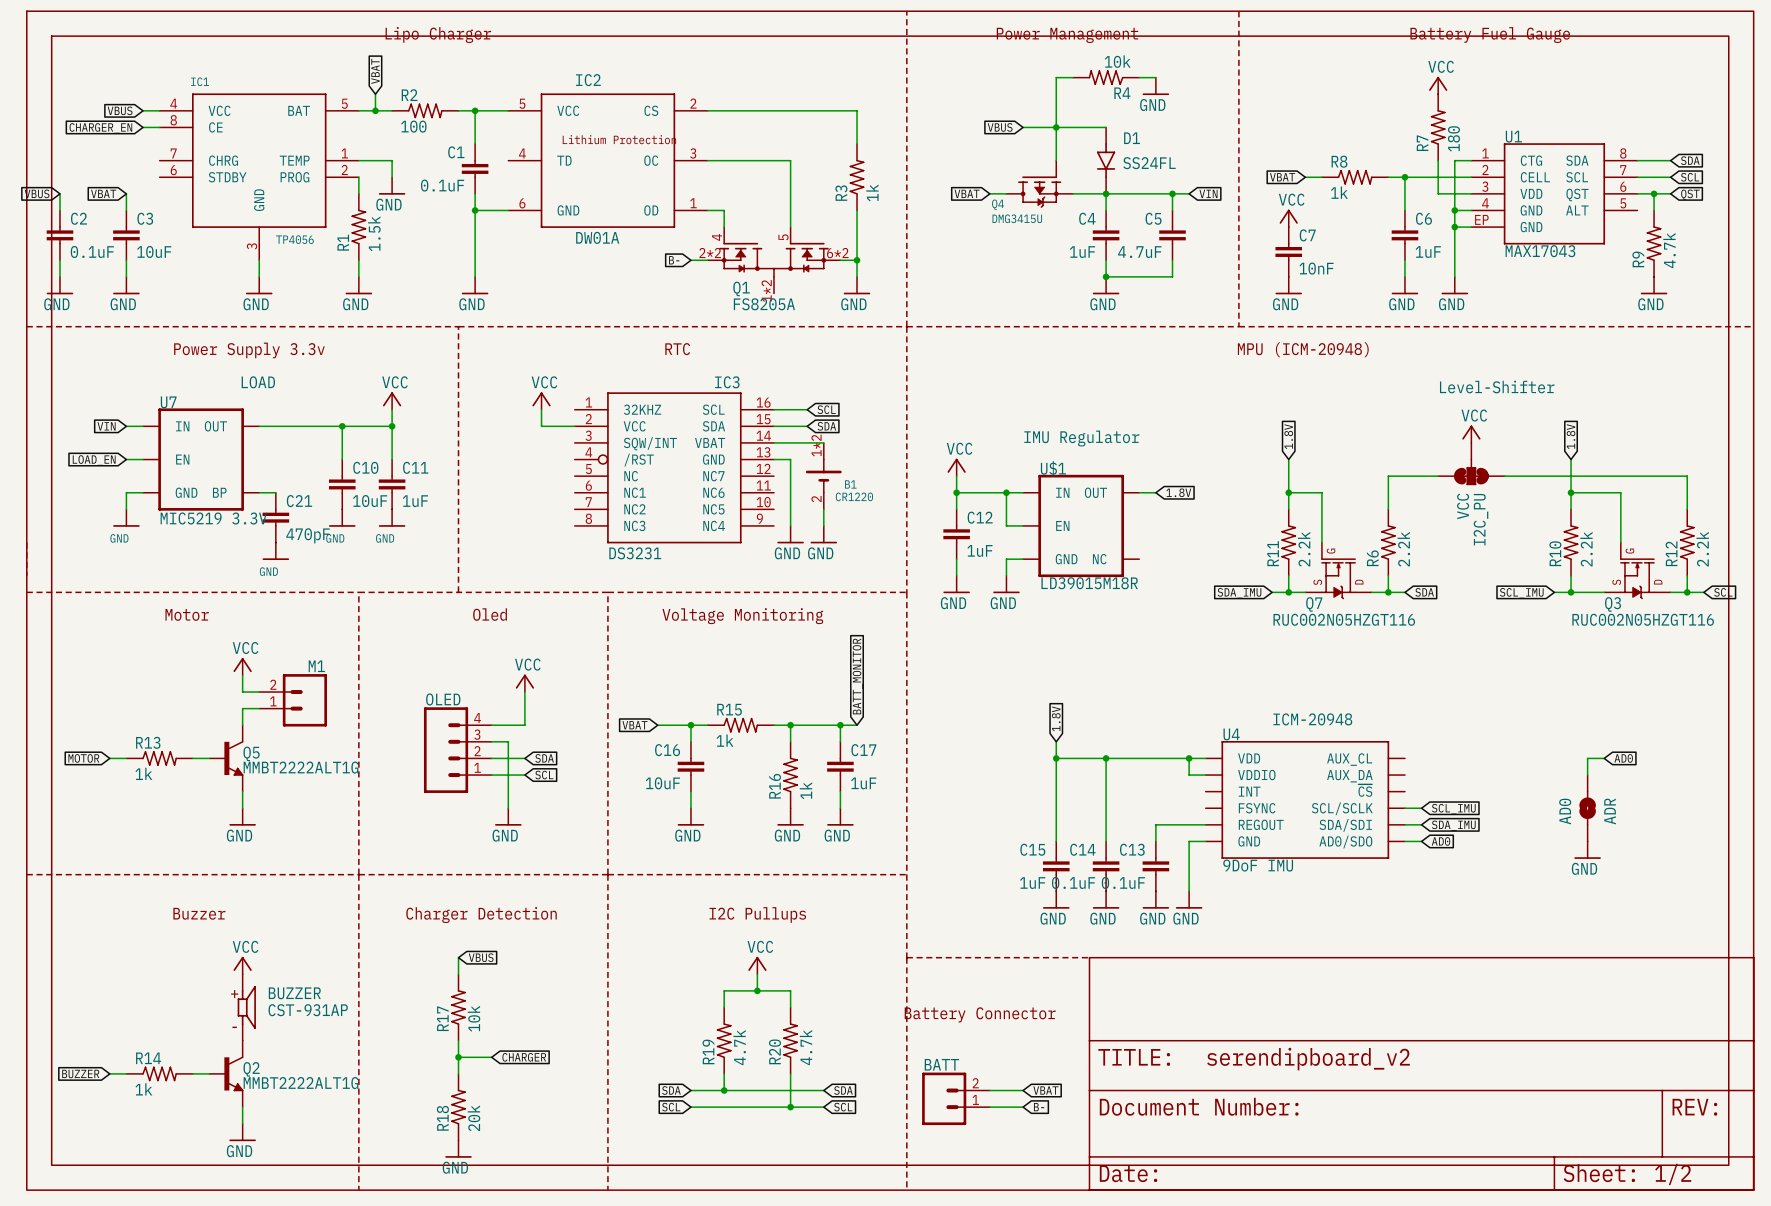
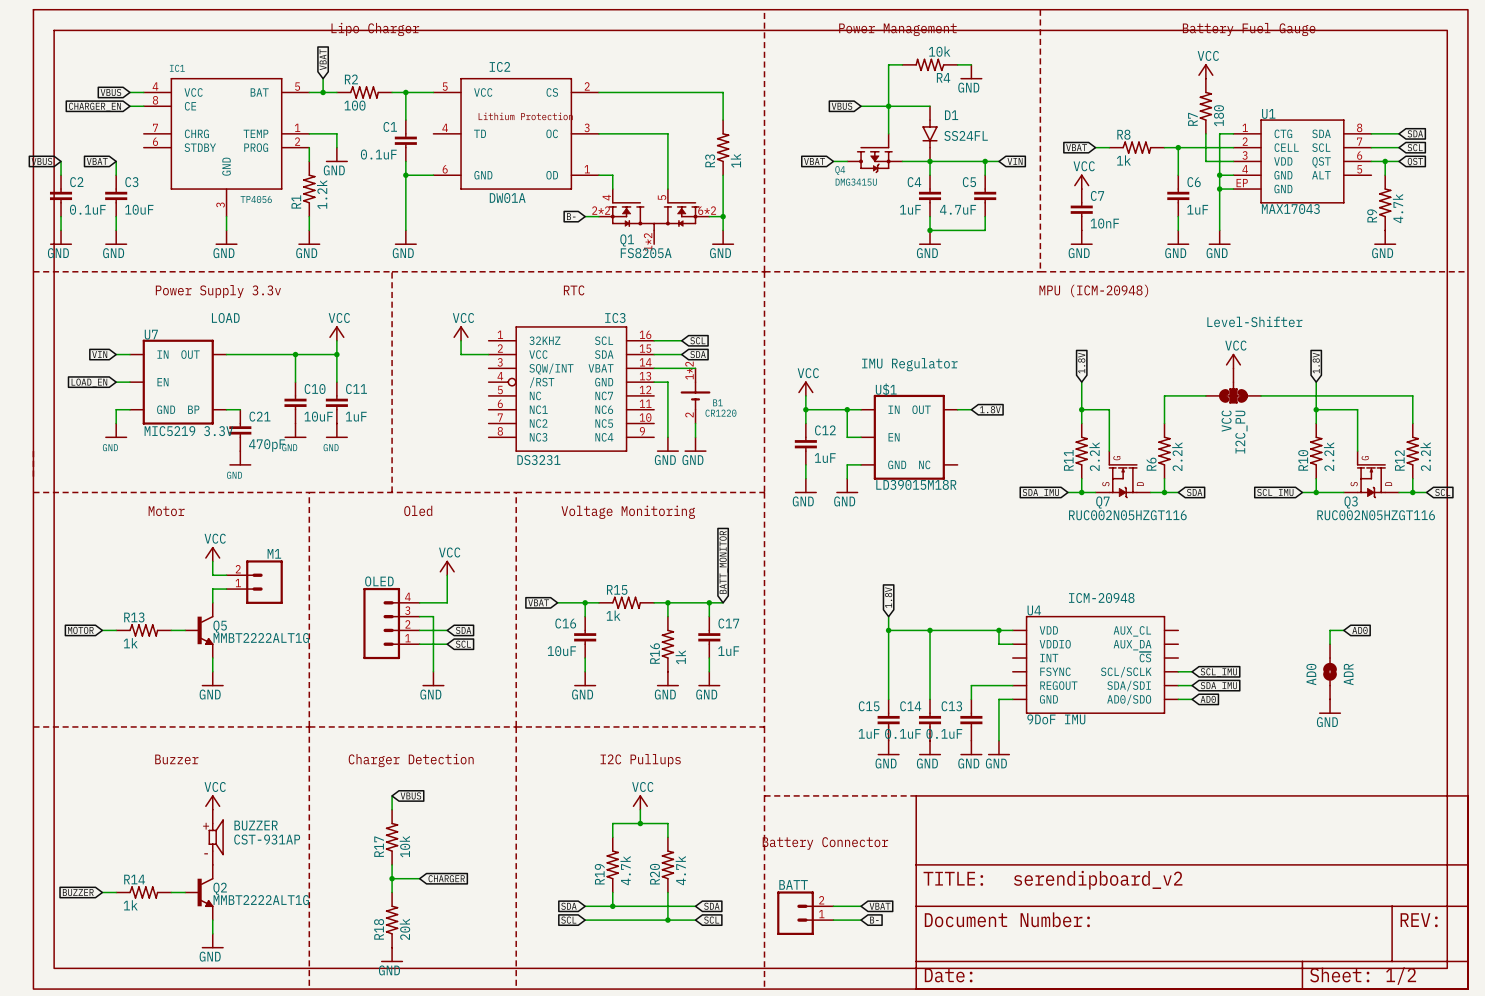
R1 value: 1.5k (374, 233) -> 1.2k (322, 194)

